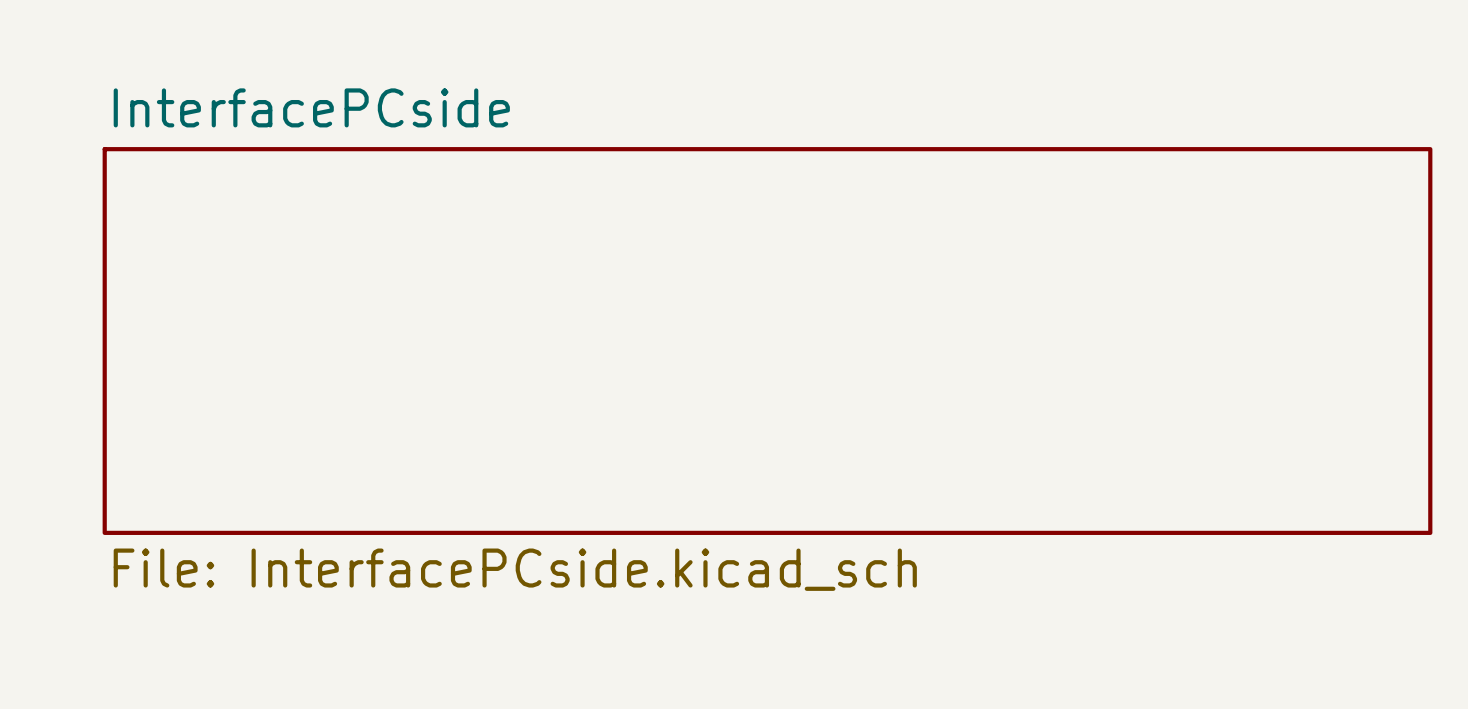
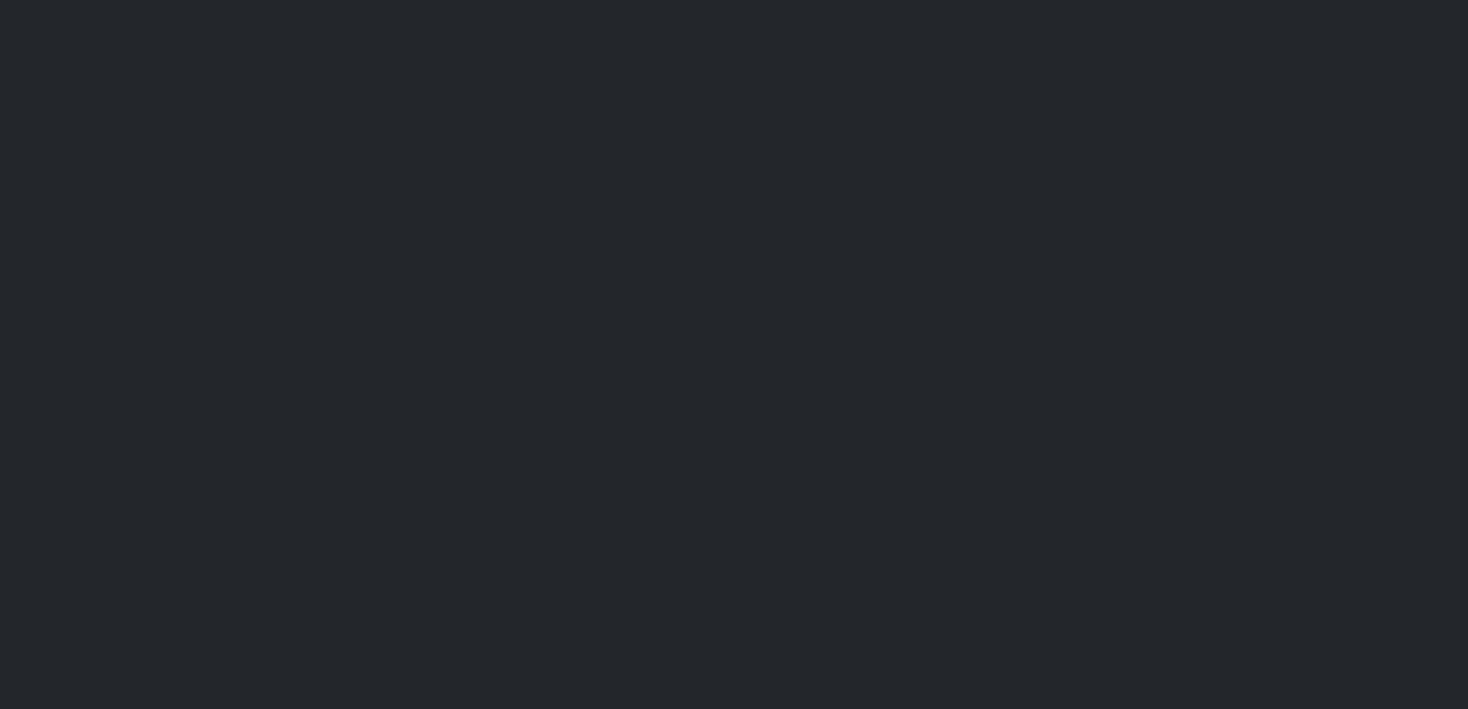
sheet InterfacePCside: File: InterfacePCside.kicad_sch (767, 341) -> none

